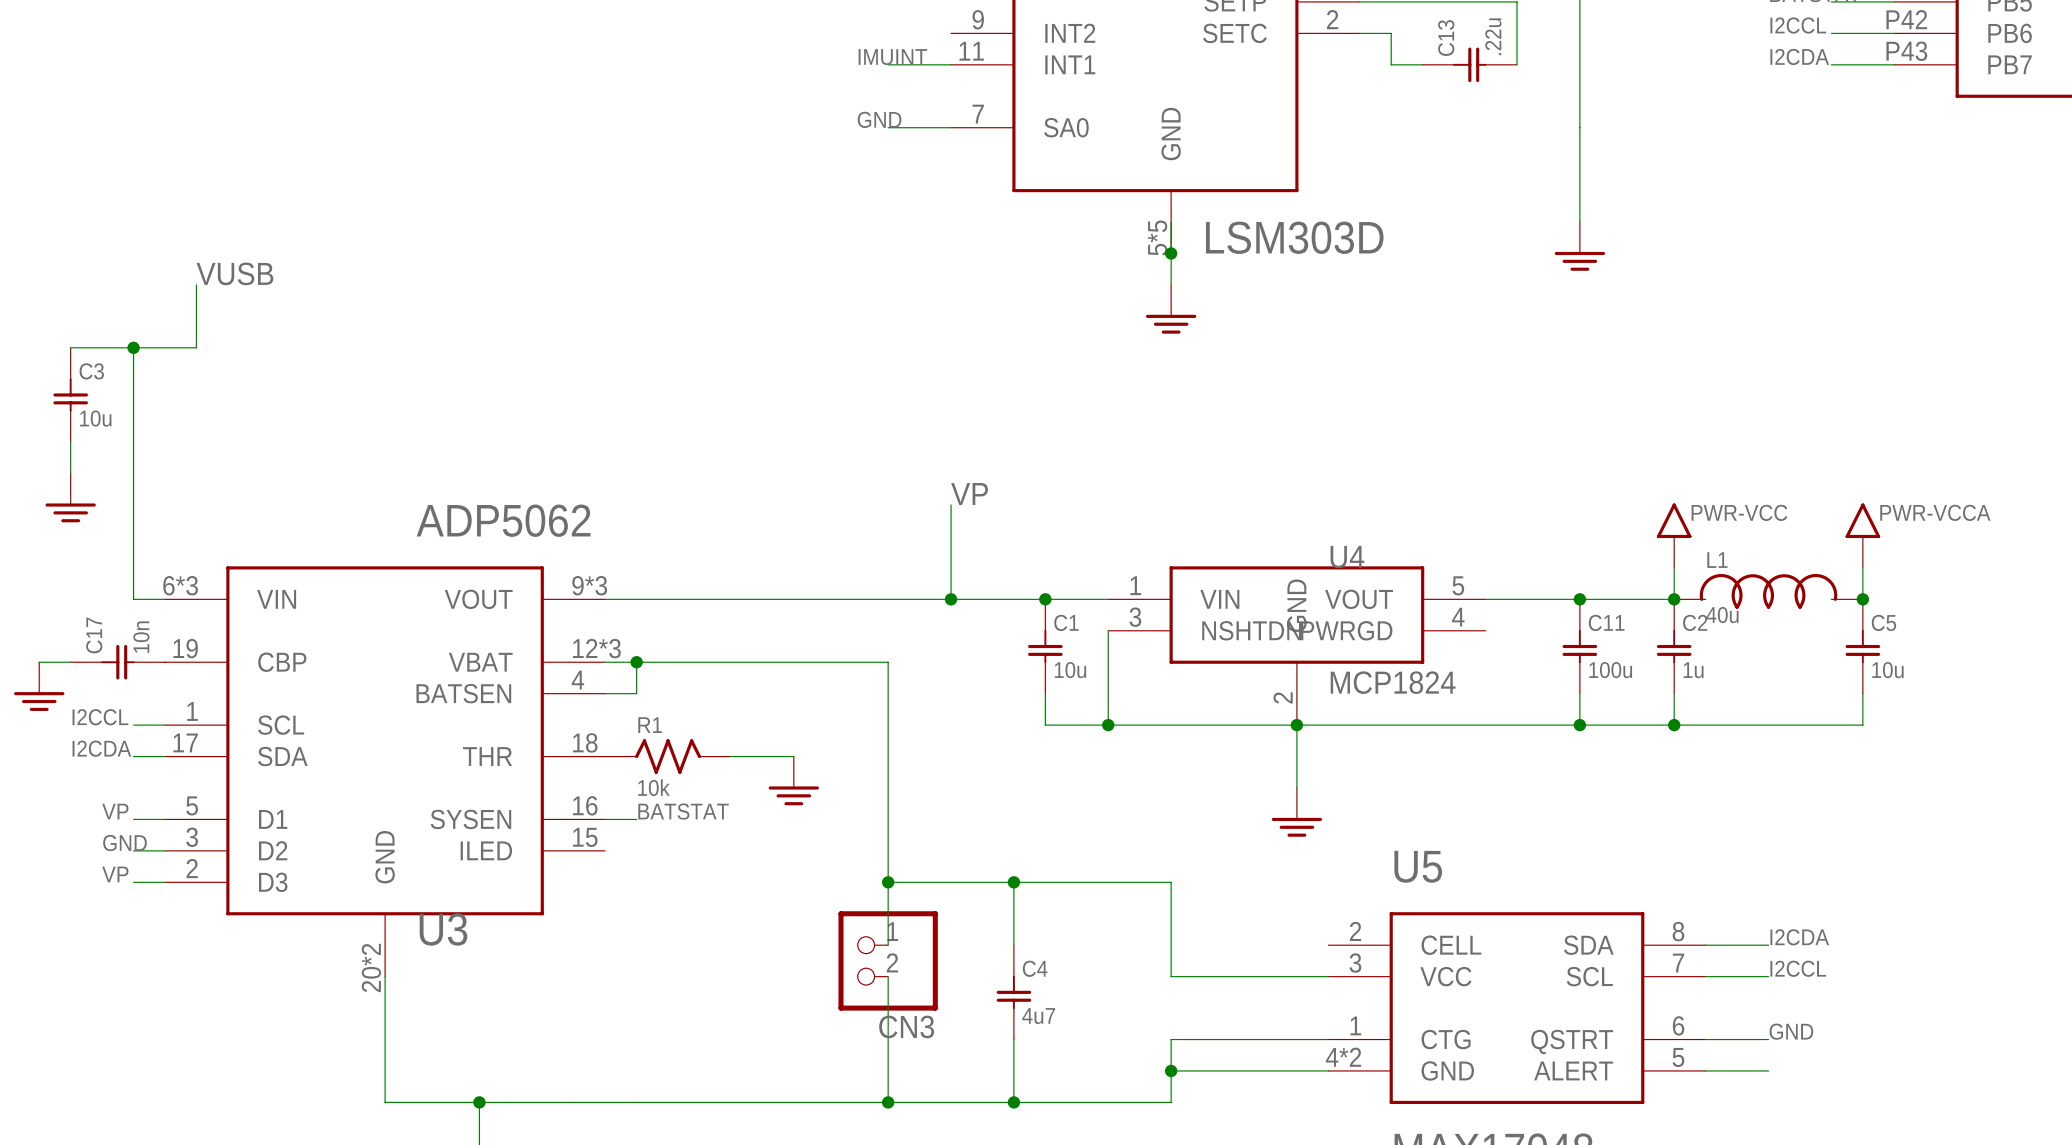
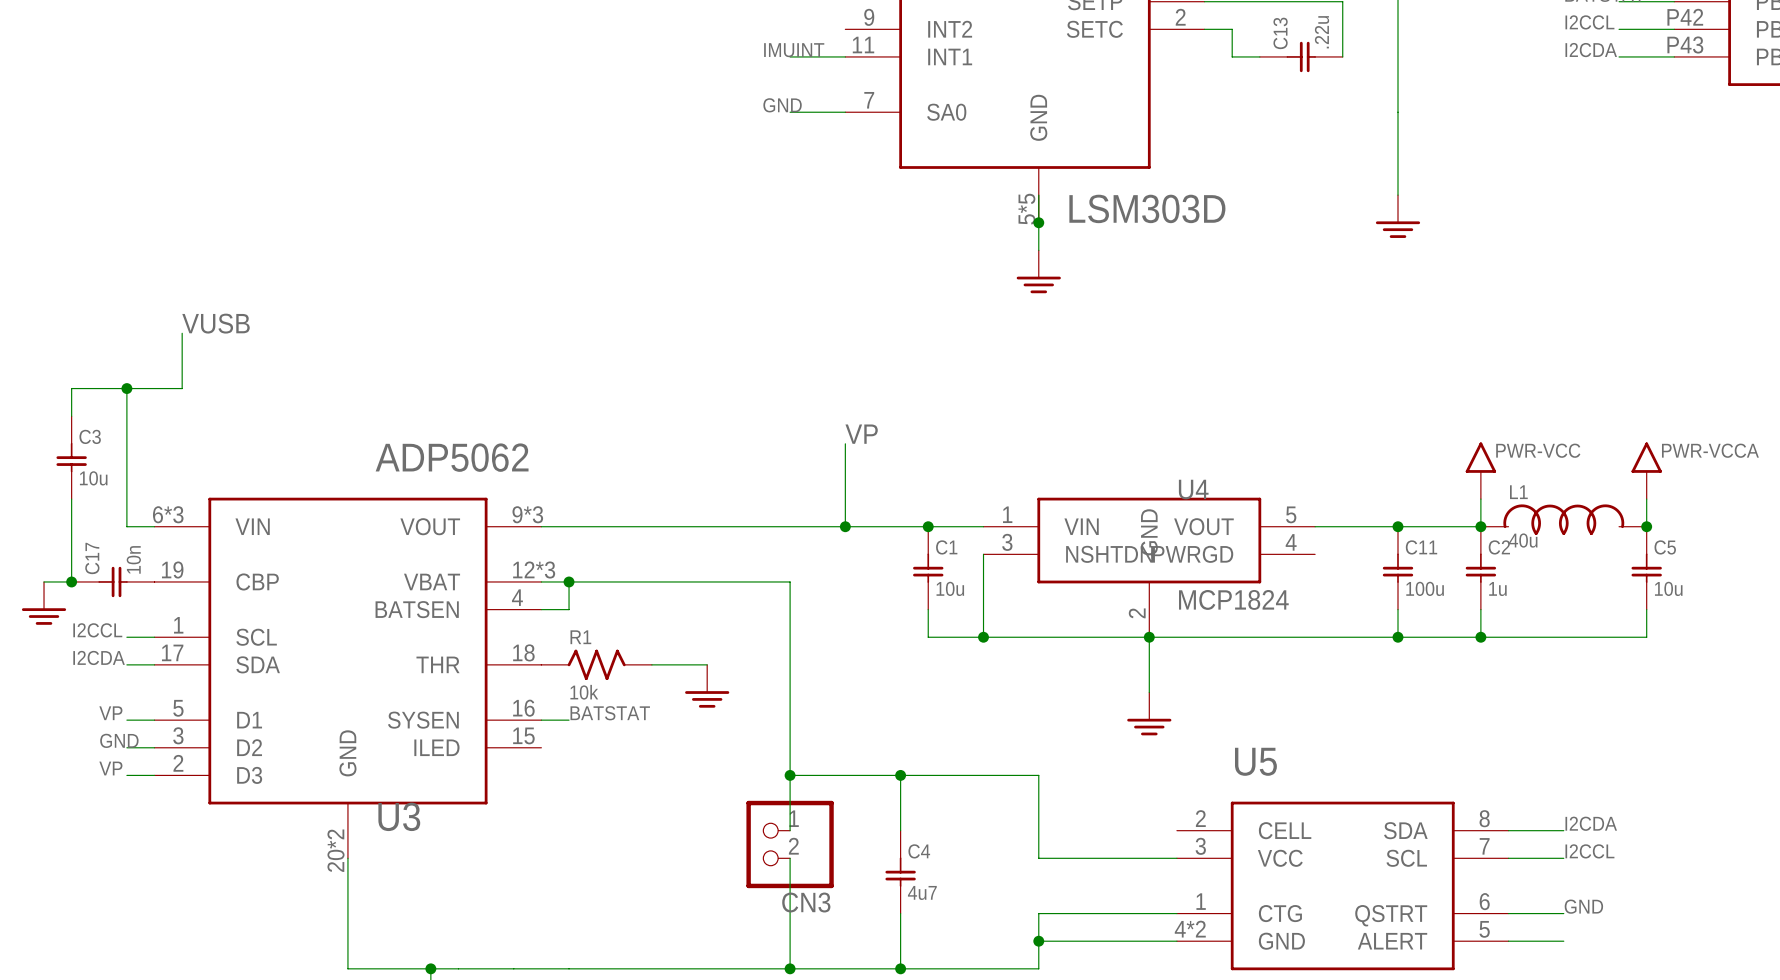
label position: VUSB (234, 273) -> VUSB (216, 323)
wire: (196, 284) (196, 347) (70, 347) -> (182, 333) (182, 388) (71, 388)
wire: (133, 347) (133, 442) -> (71, 499) (71, 581)
junction: (133, 347) -> none
C3 position: (70, 394) -> (71, 457)
junction: none -> (126, 388)
power symbol: (70, 497) -> none
junction: none -> (71, 581)

